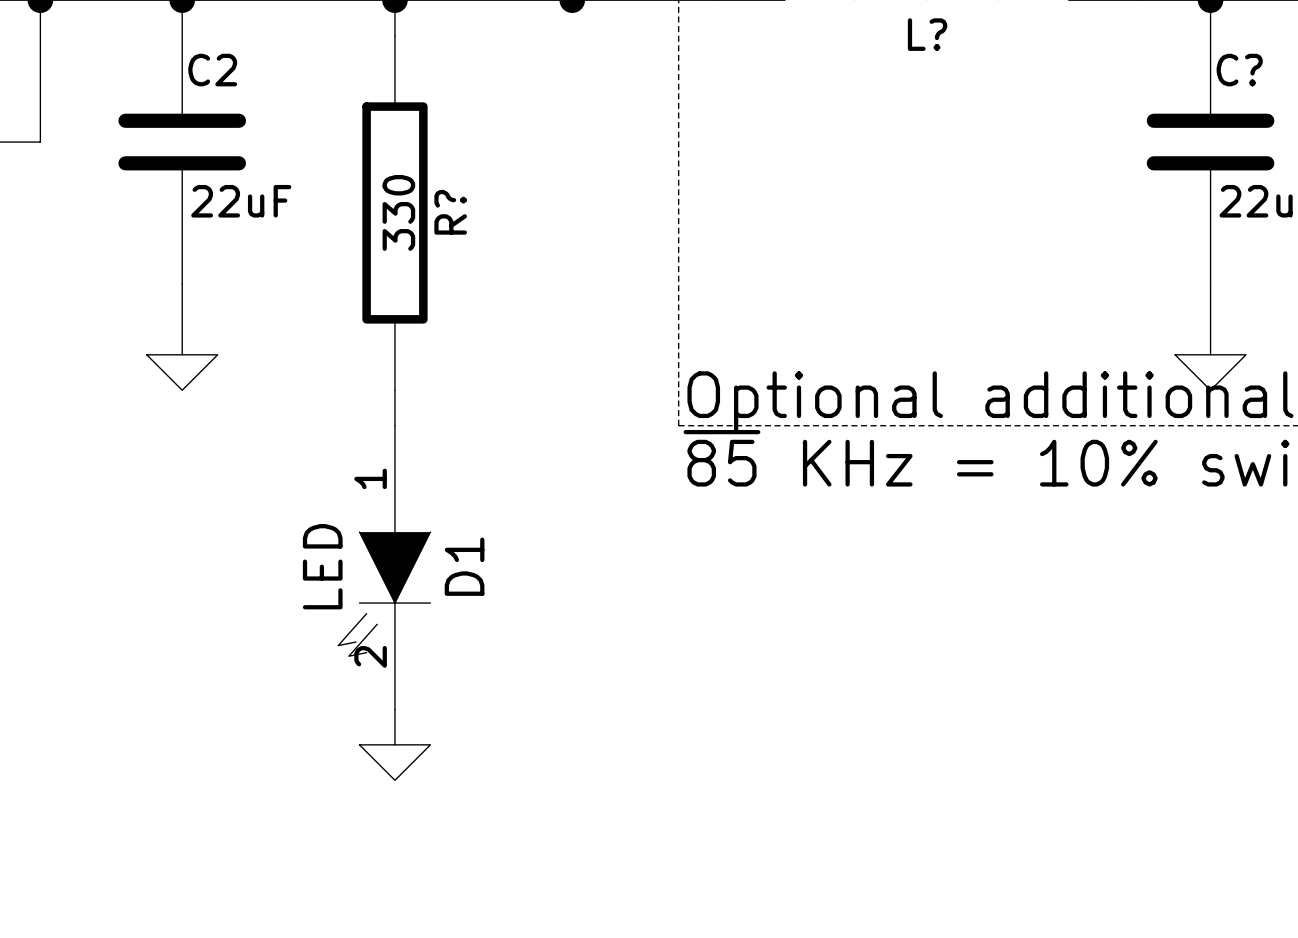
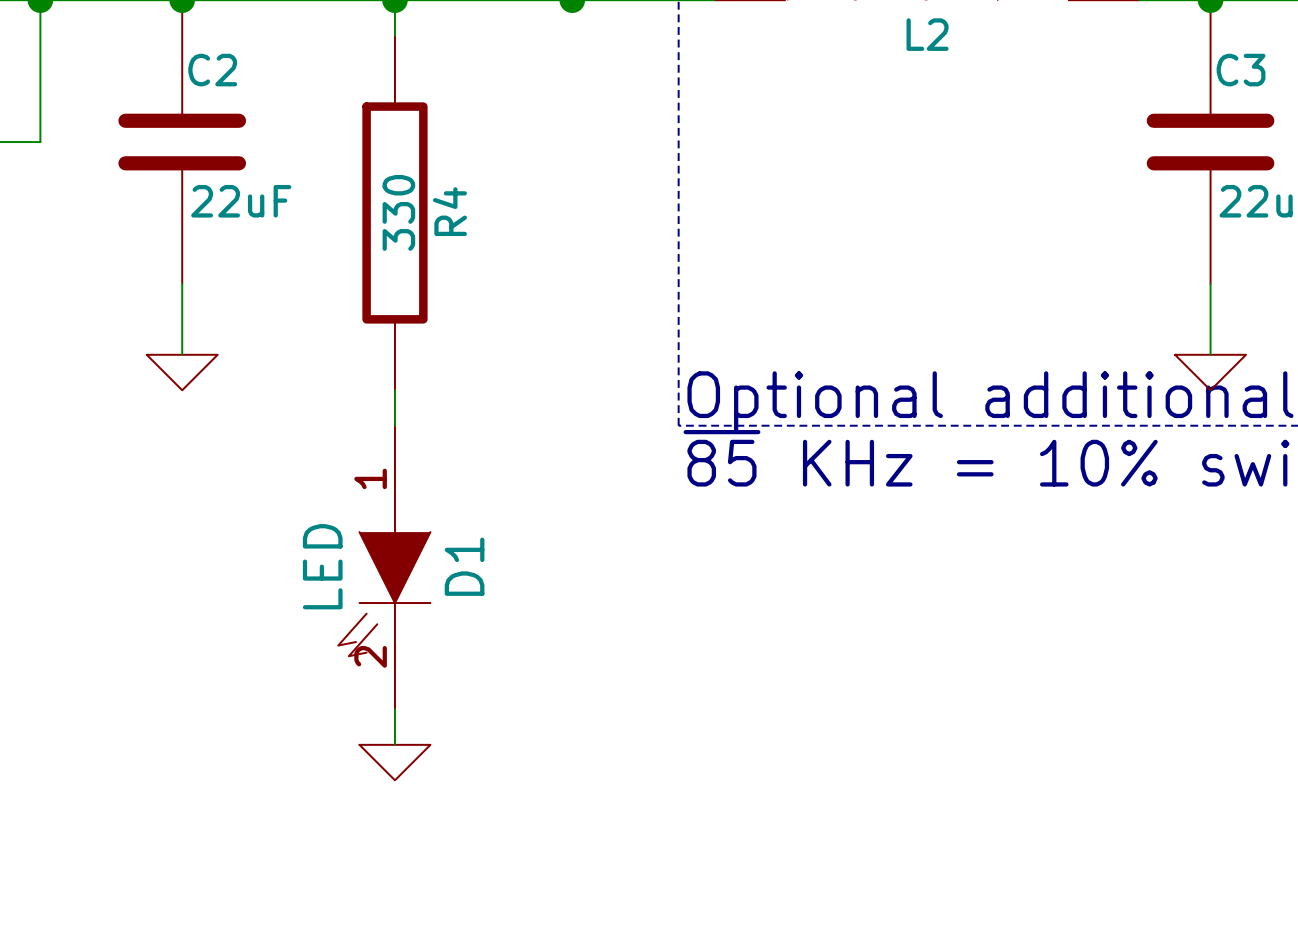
L? name: L? (927, 34) -> L2 (927, 34)
C? name: C? (1239, 70) -> C3 (1241, 70)
R? name: R? (450, 212) -> R4 (449, 211)

